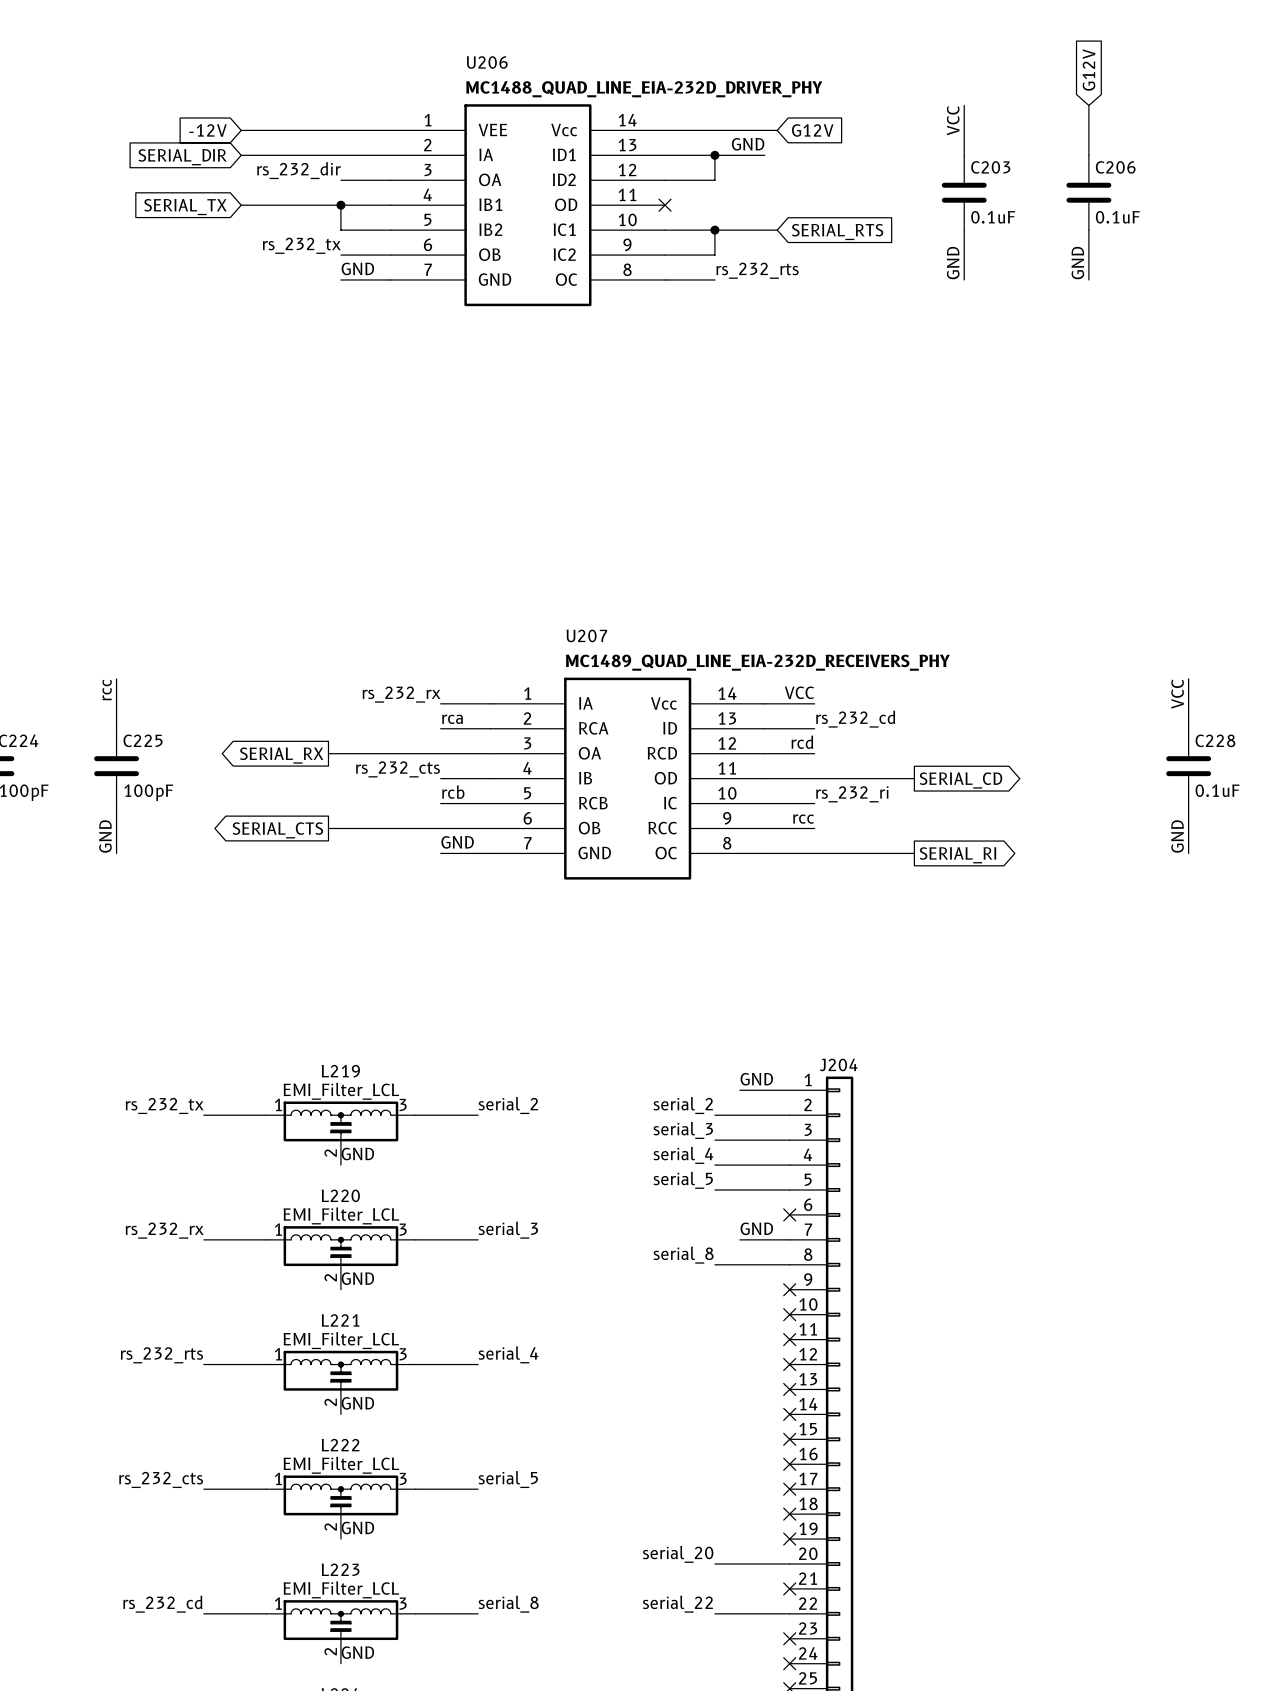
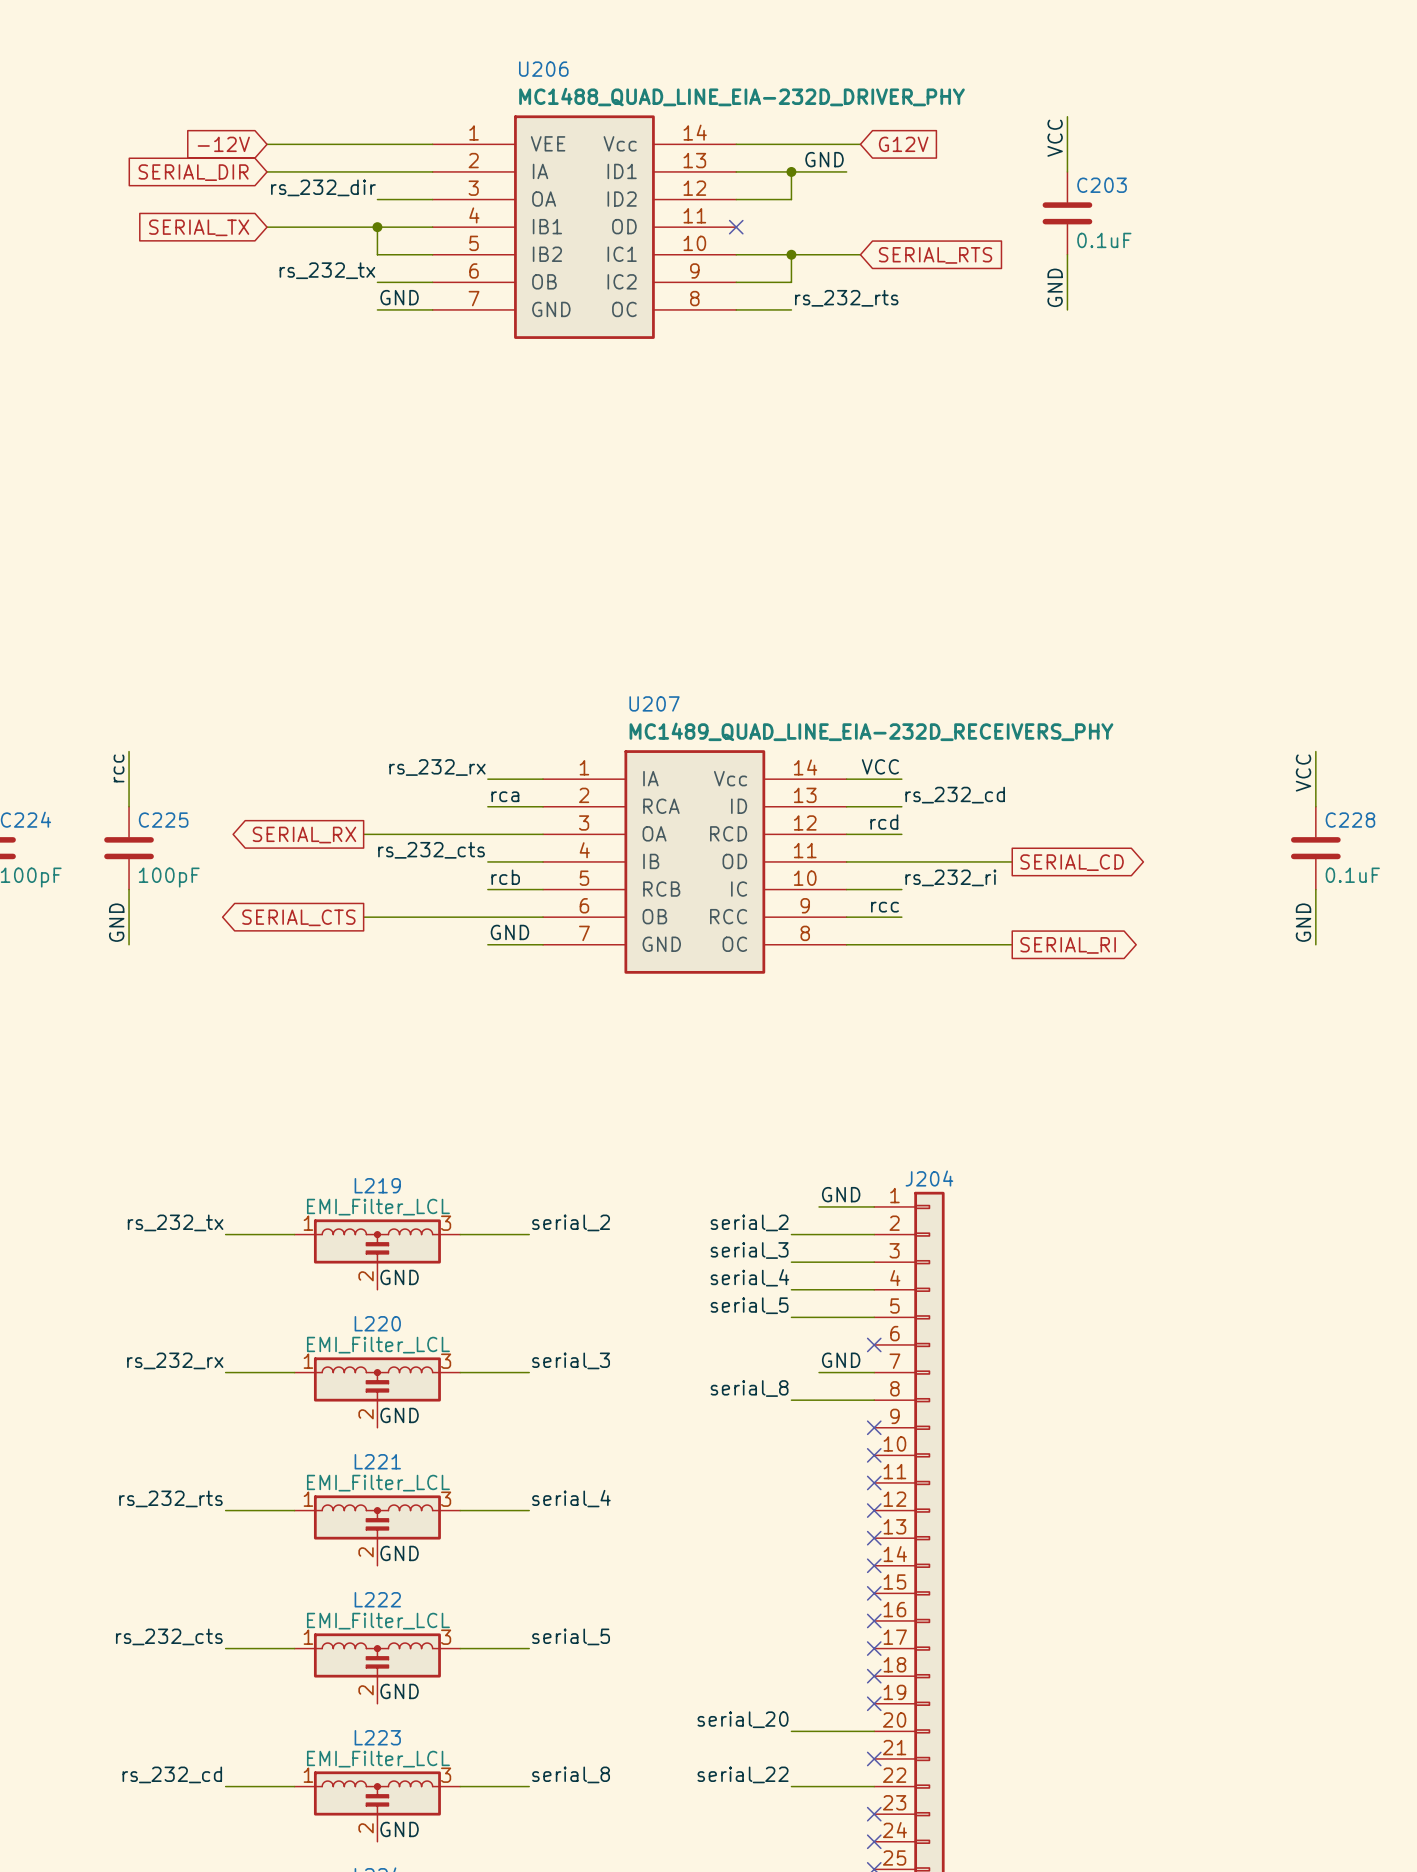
global label: G12V (1088, 70) -> none
wire: (1088, 105) (1088, 155) -> none
C206: 0.1uF (1088, 192) -> none
wire: (1088, 230) (1088, 279) -> none
label: GND (1077, 263) -> none

